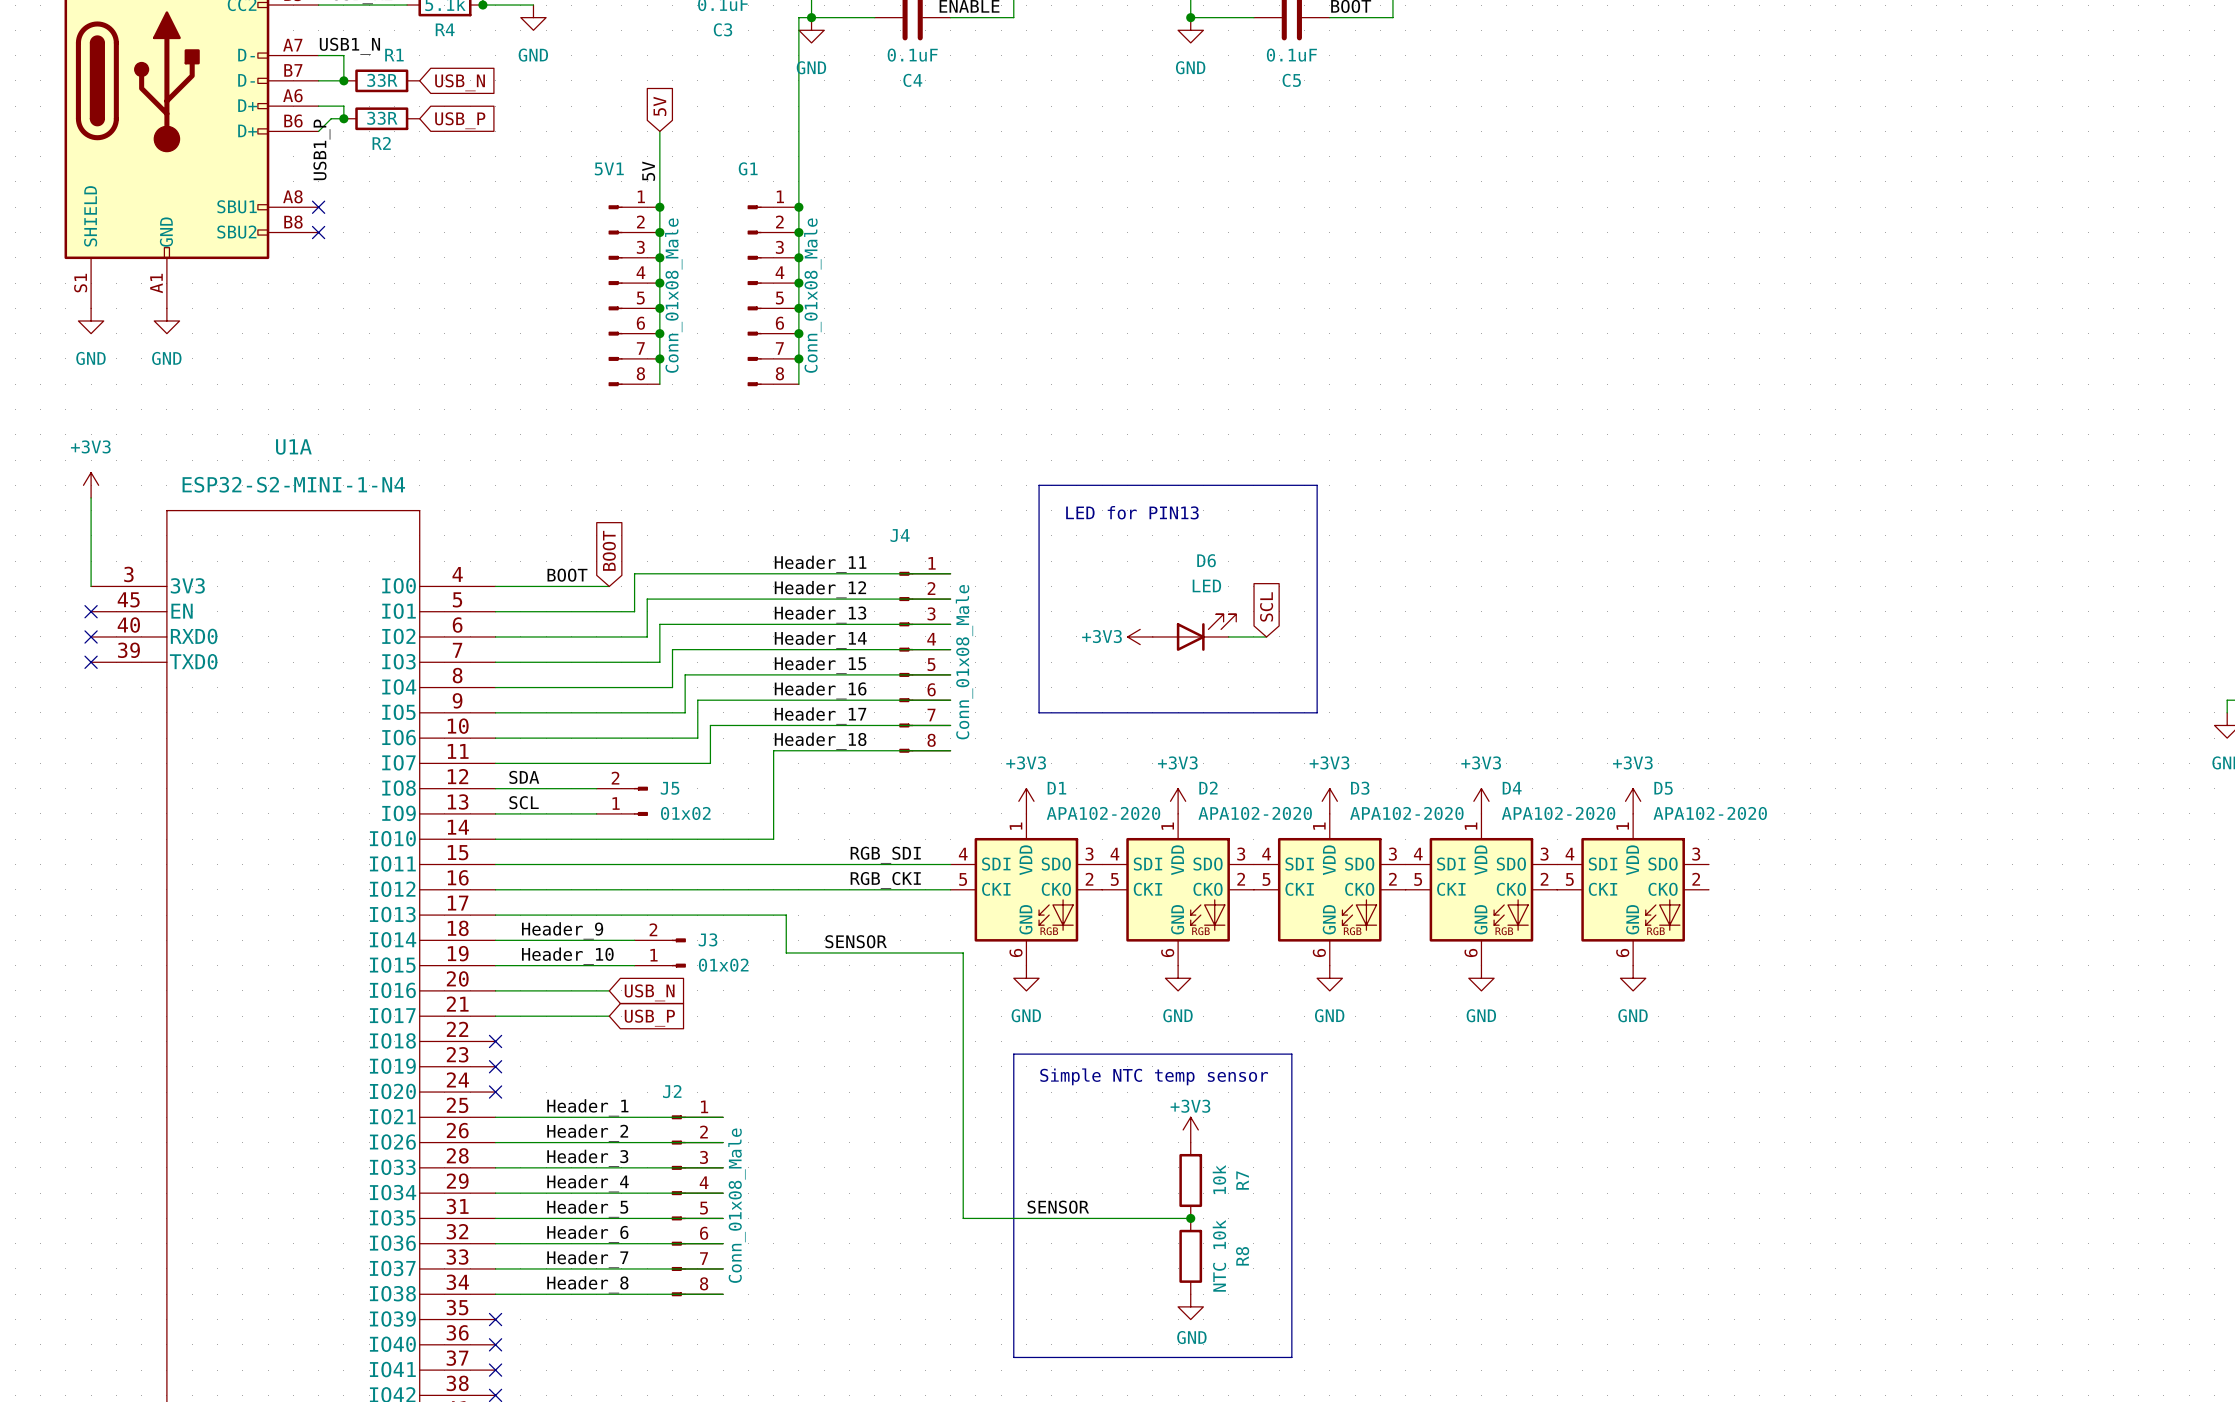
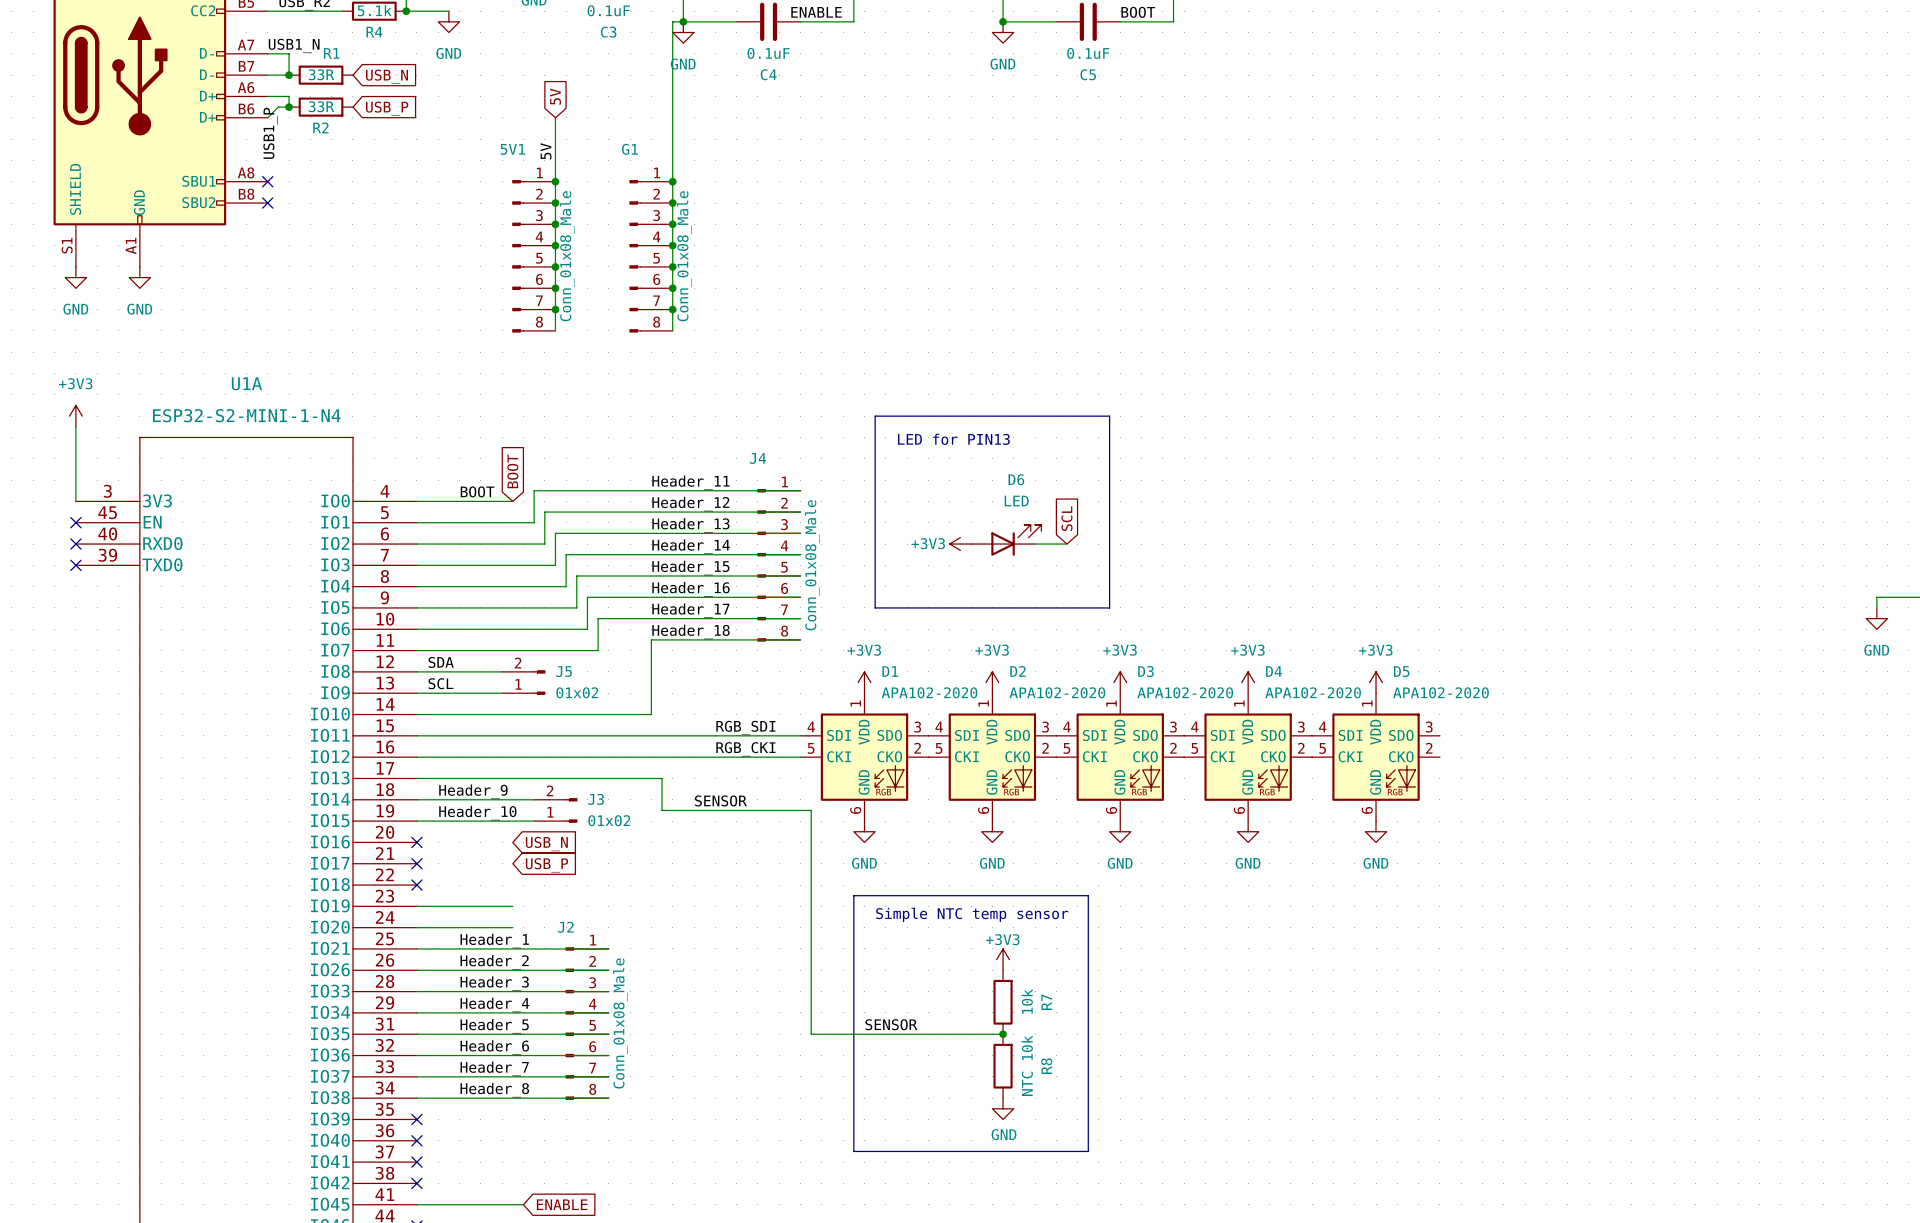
wire: (495, 990) (609, 990) -> (416, 906) (512, 906)
no-connect mark: none -> (416, 842)
wire: (495, 1016) (609, 1016) -> (416, 927) (512, 927)
no-connect mark: none -> (416, 863)
no-connect mark: (495, 1066) -> none
no-connect mark: (495, 1092) -> none

